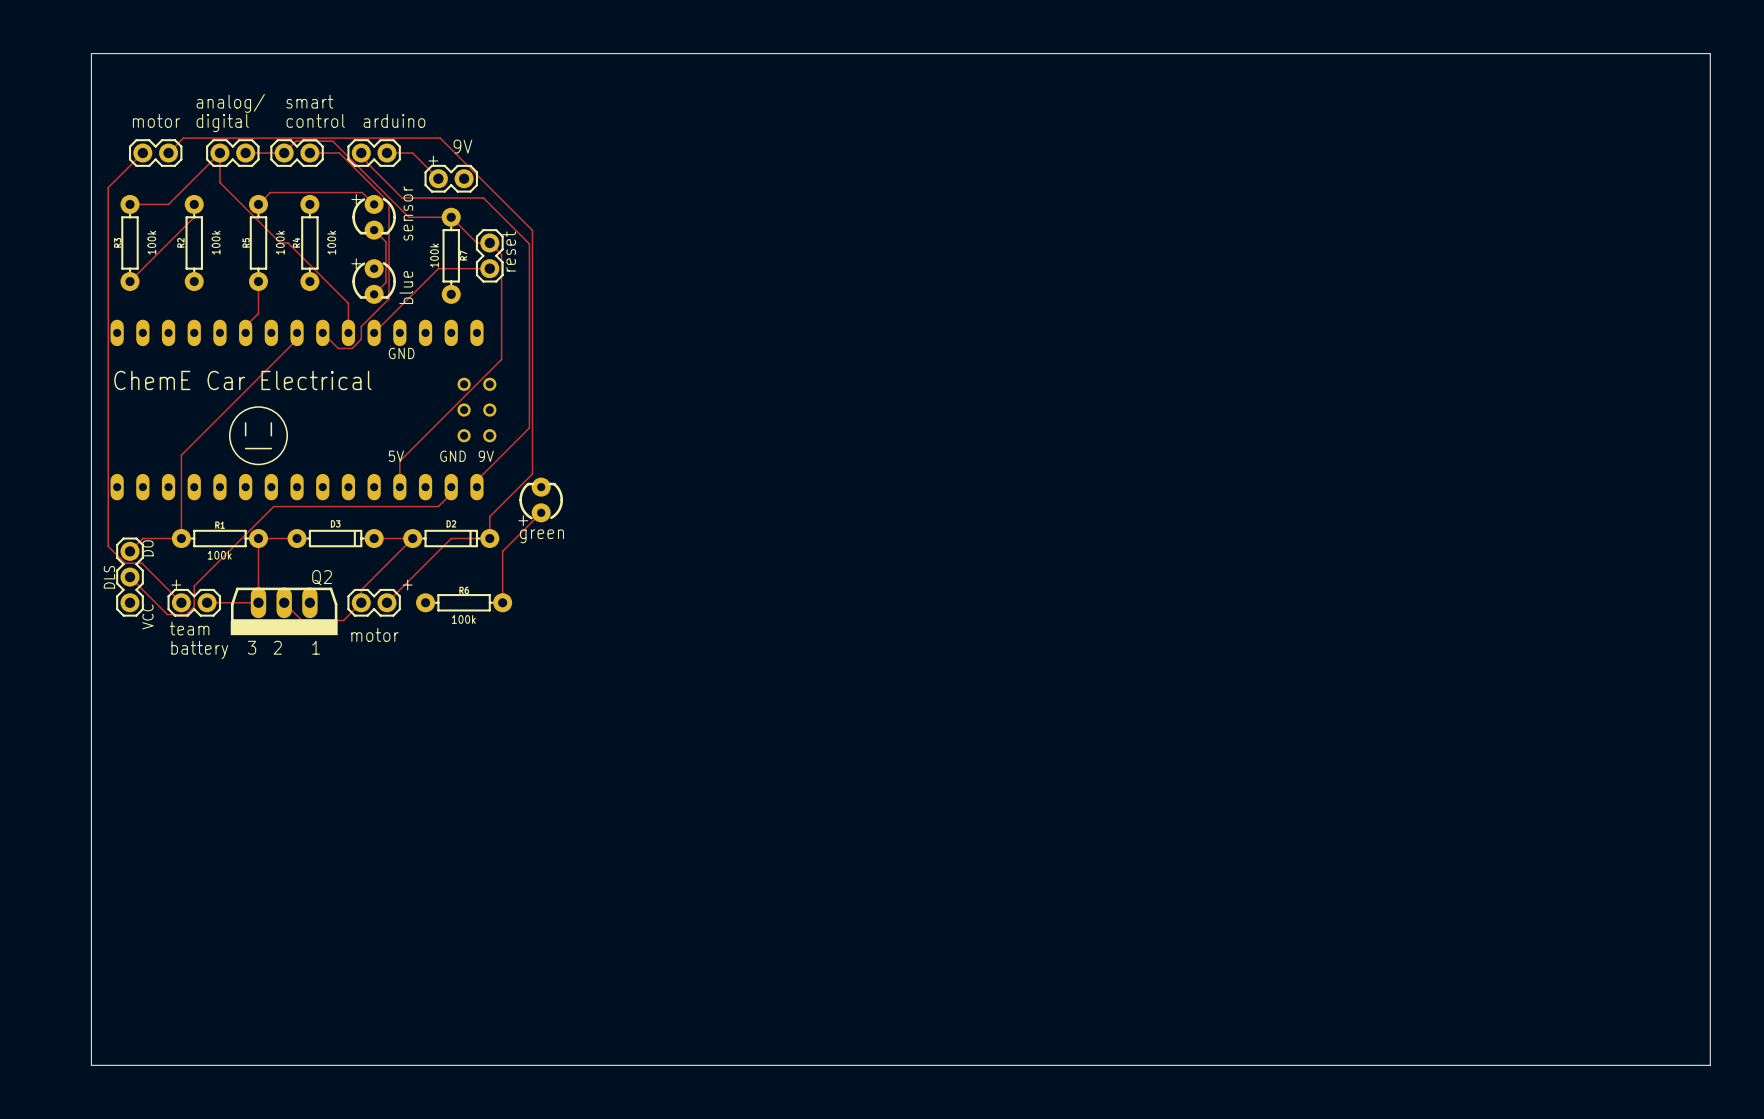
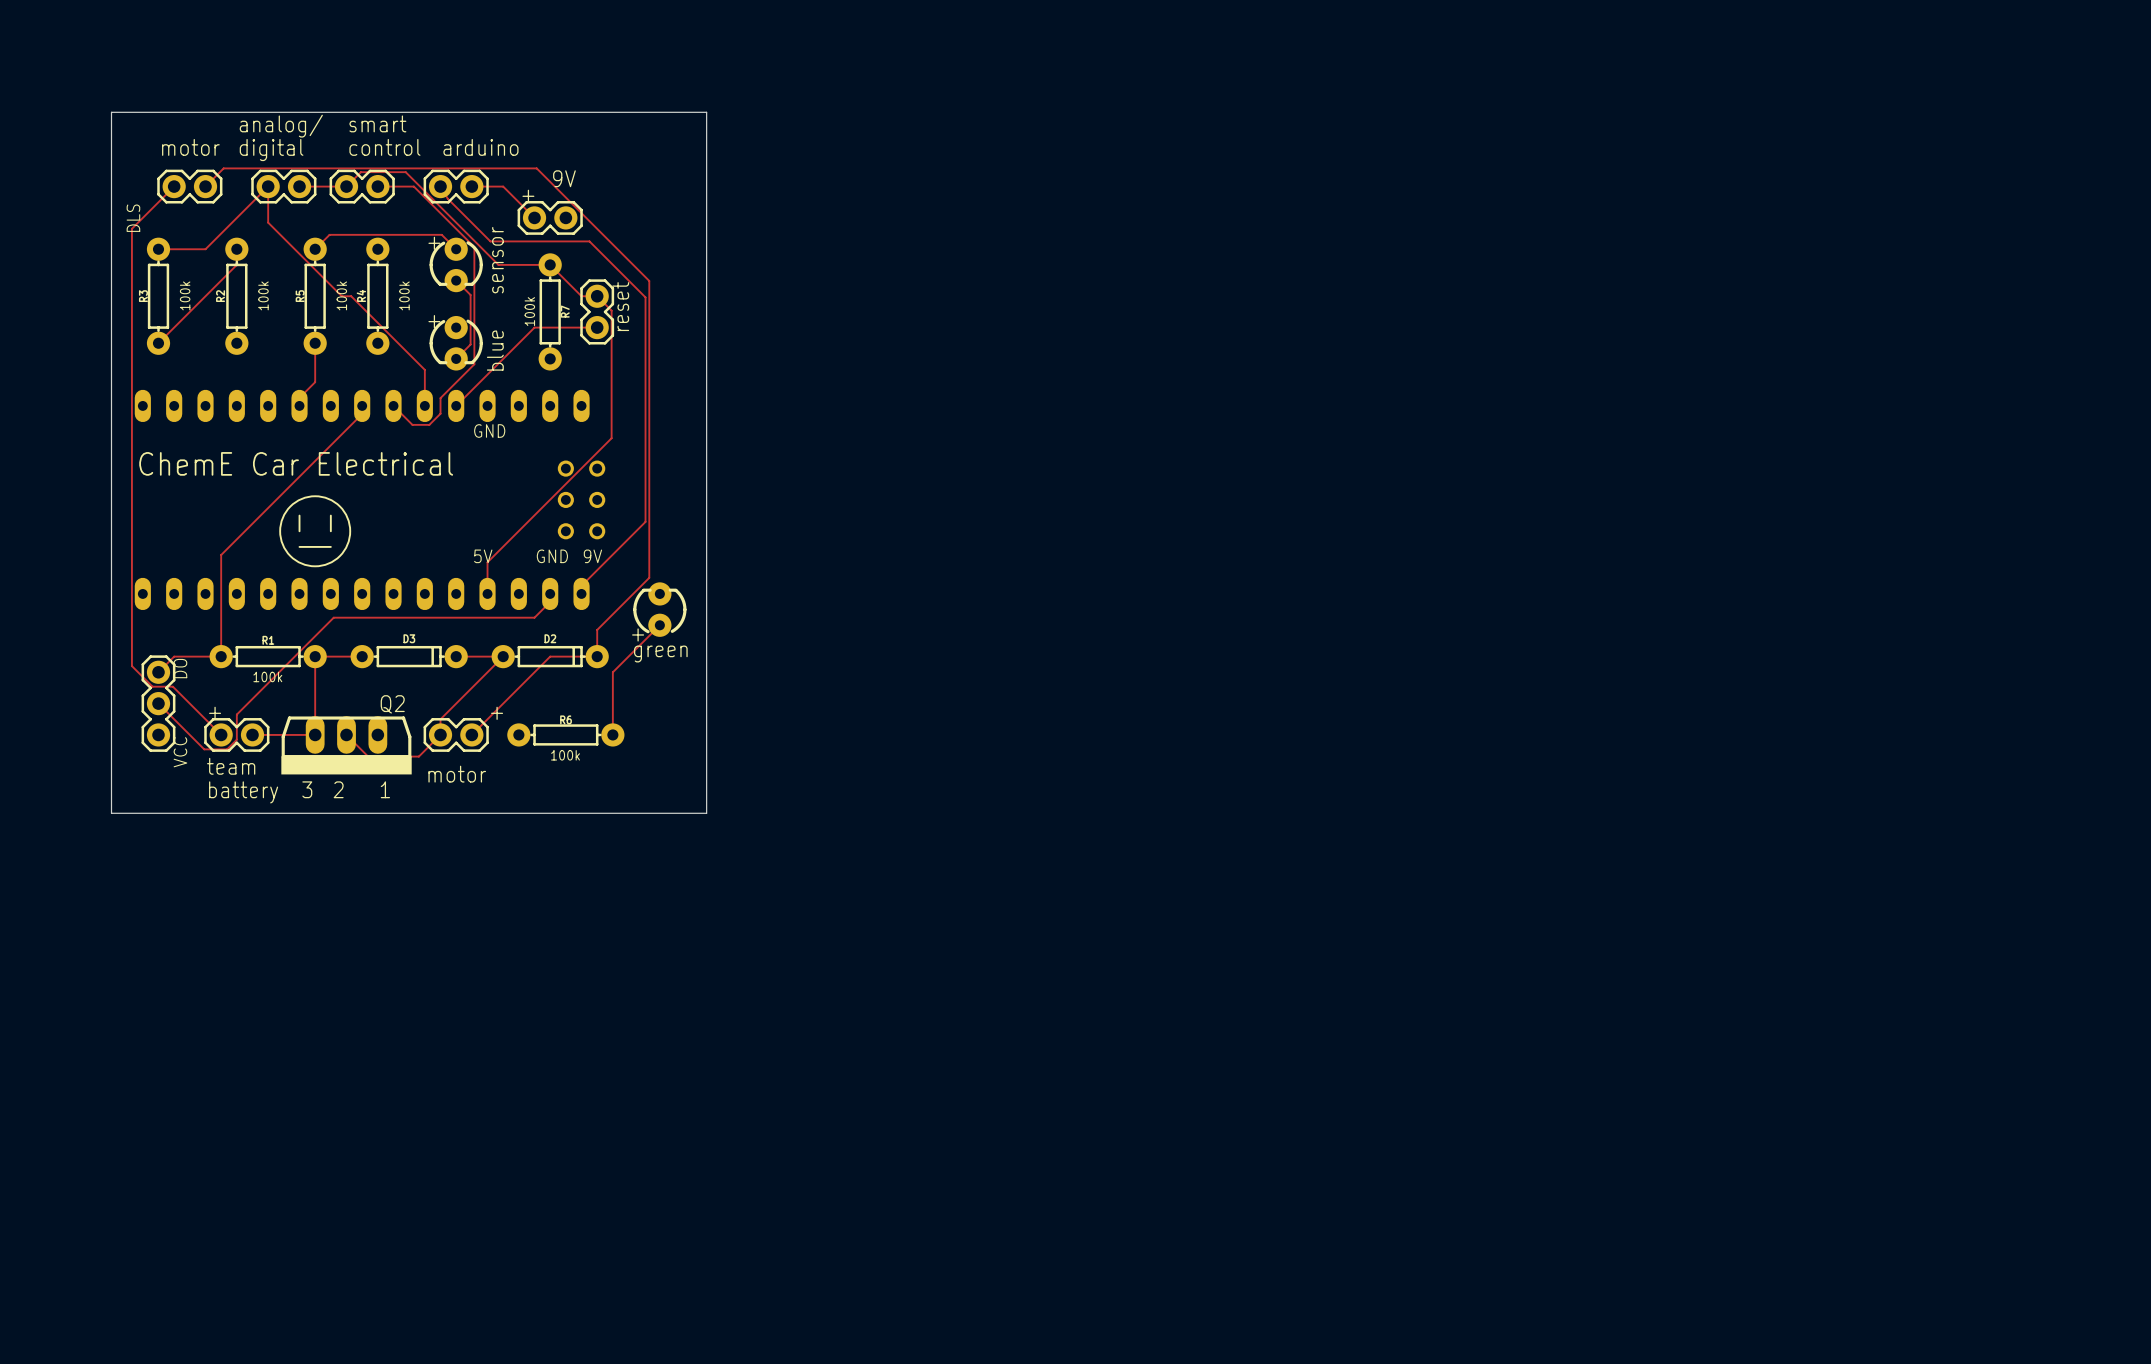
board edge: (91, 92) (91, 53) (1710, 53) (1710, 1065) (91, 1065) (91, 667) -> (111, 112) (706, 112) (706, 813) (111, 813)
text: none -> DLS (133, 218)
text: DLS (109, 577) -> none

